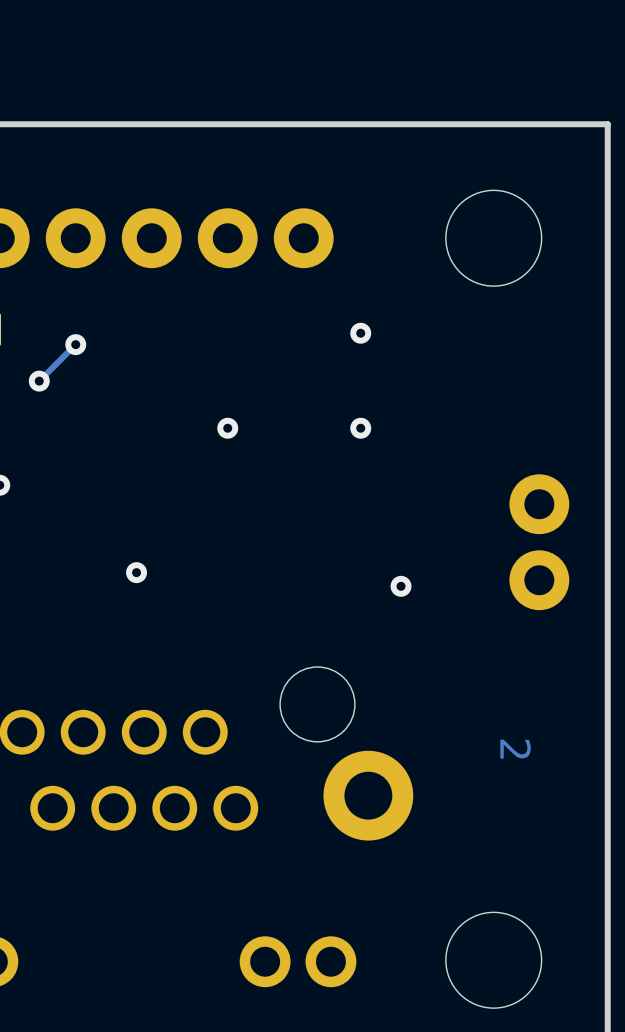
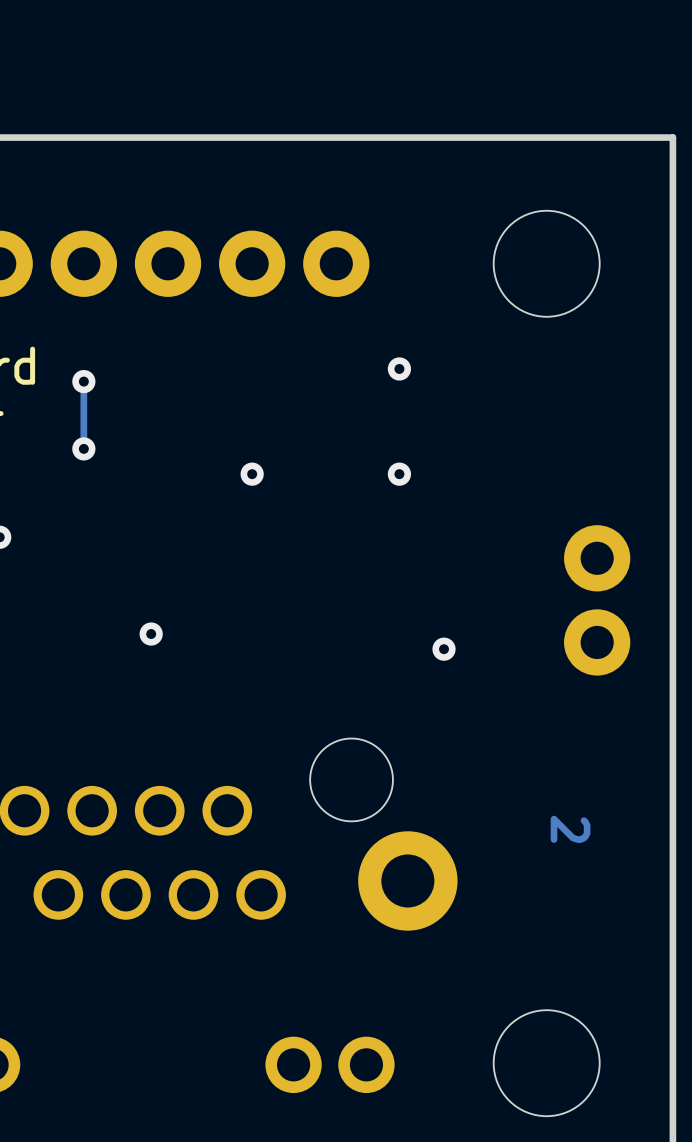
track: (75, 344) (39, 381) -> (83, 381) (83, 448)
via position: (39, 381) -> (83, 448)

